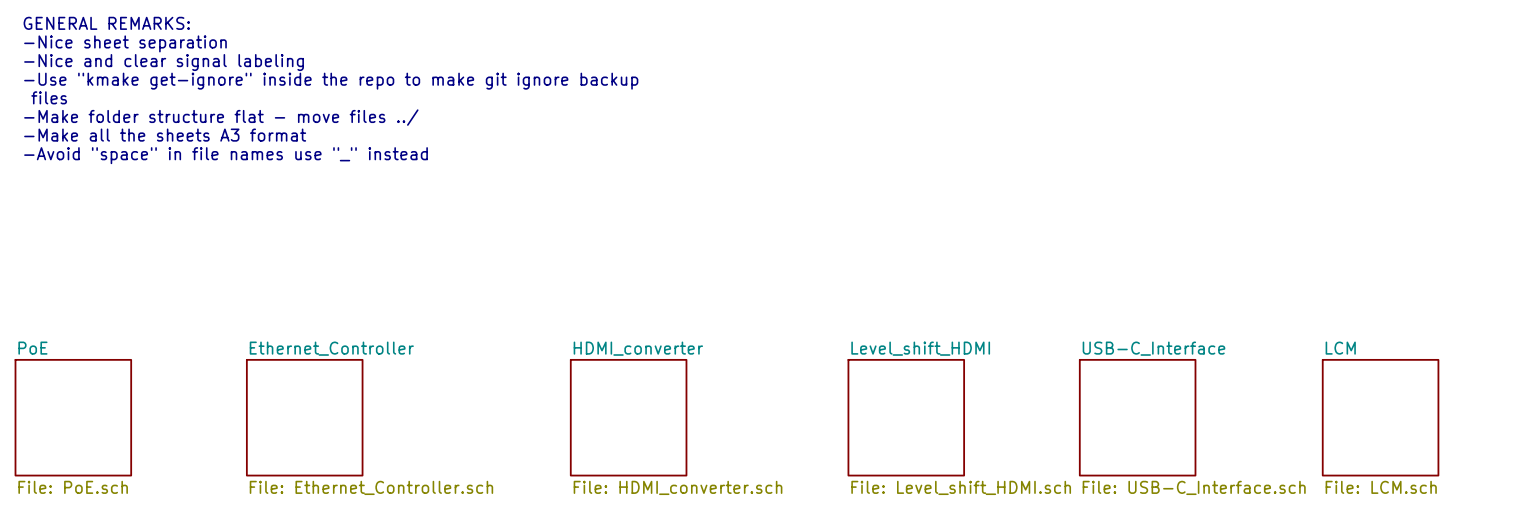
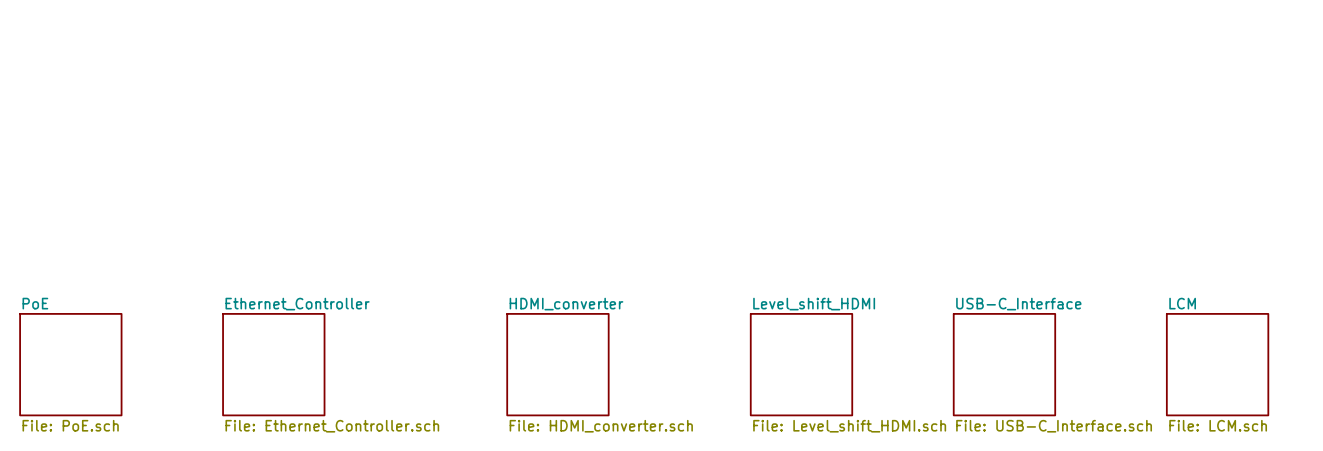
text: GENERAL REMARKS: (106, 23) -> none
text: -Nice sheet separation (125, 43) -> none
text: -Nice and clear signal labeling (164, 62) -> none
text: -Use "kmake get-ignore" inside the repo to make git ignore backup (331, 81) -> none
text: files (49, 97) -> none
text: -Make folder structure flat - move files ../ (221, 117) -> none
text: -Make all the sheets A3 format (165, 135) -> none
text: -Avoid "space" in file names use "_" instead (226, 155) -> none

